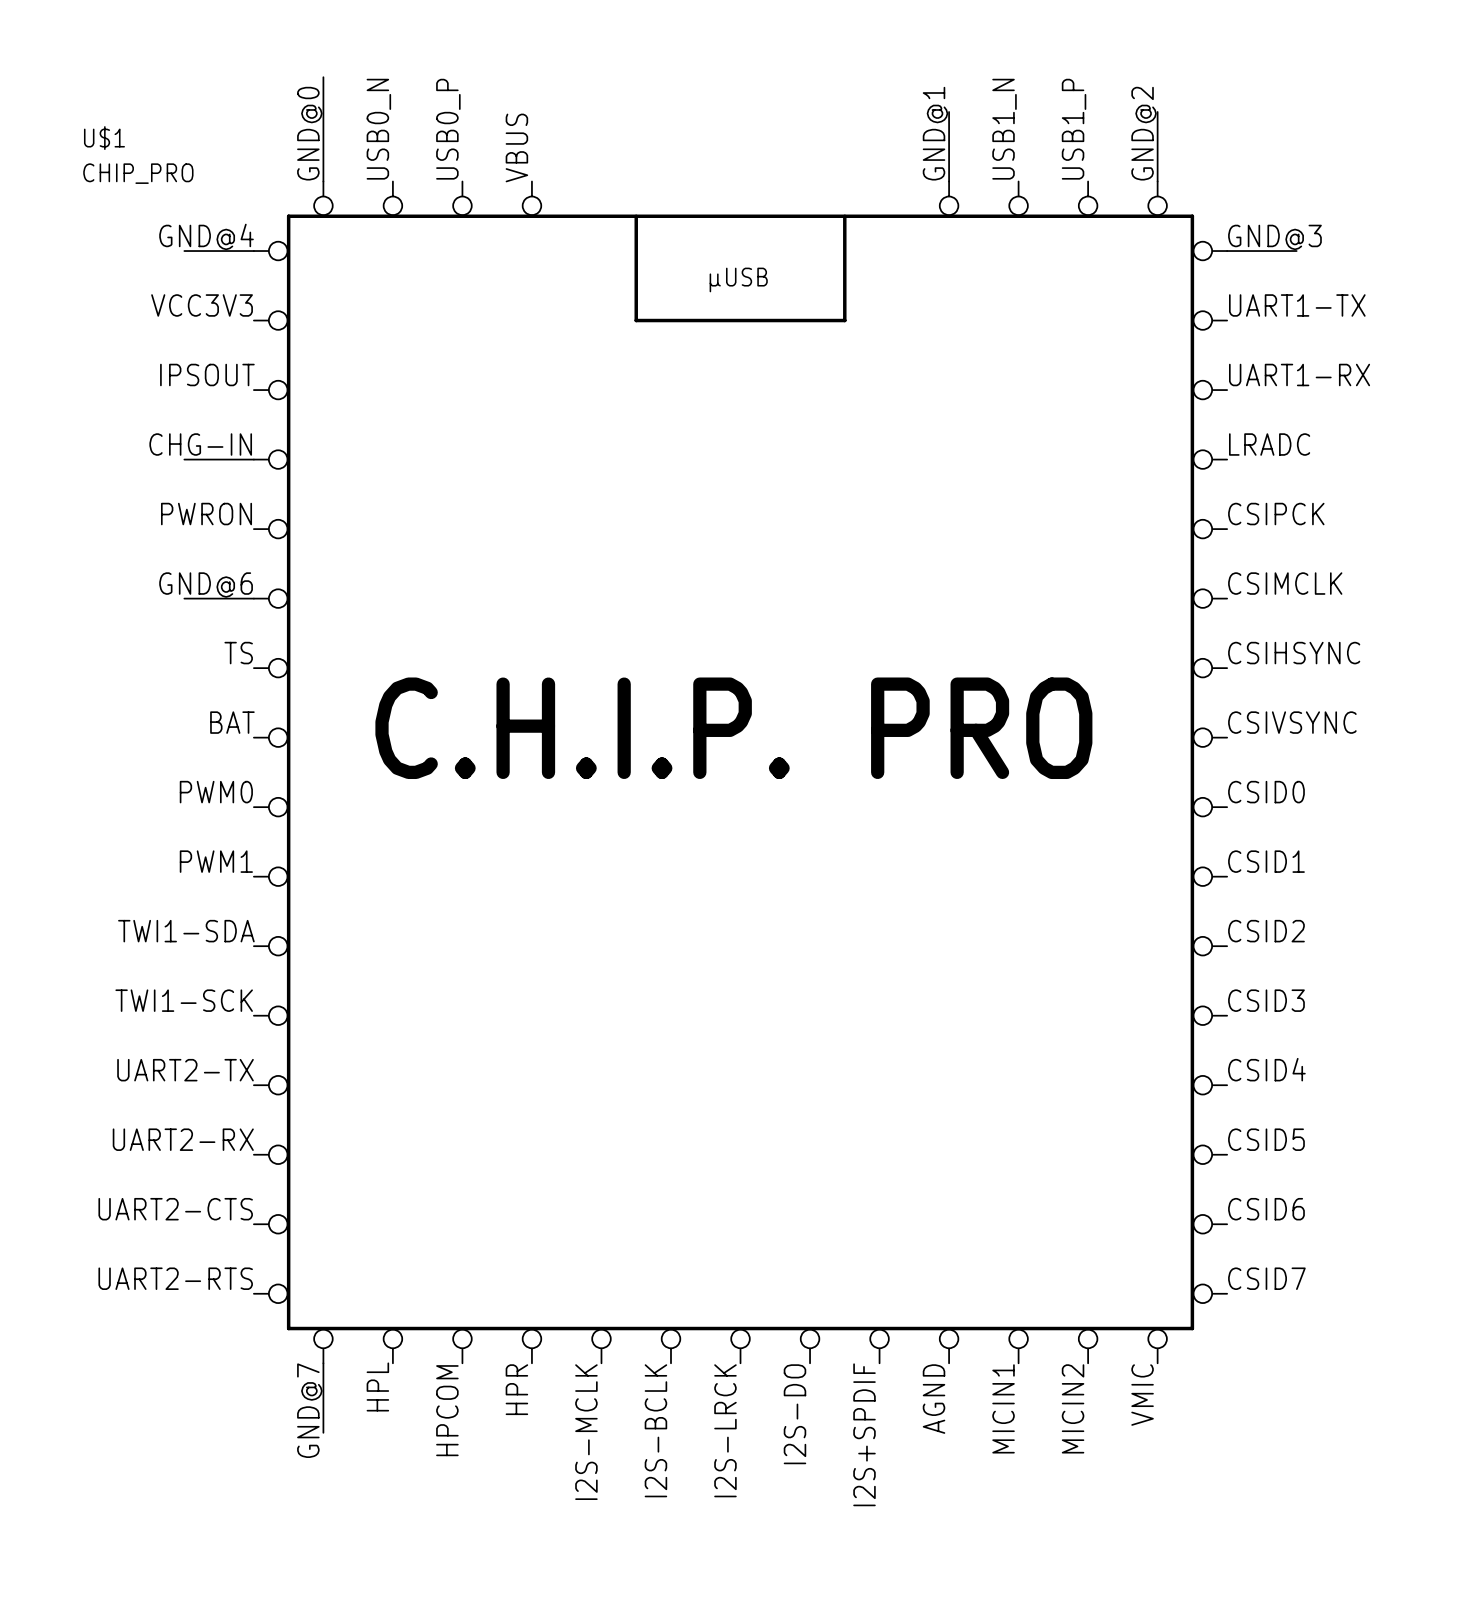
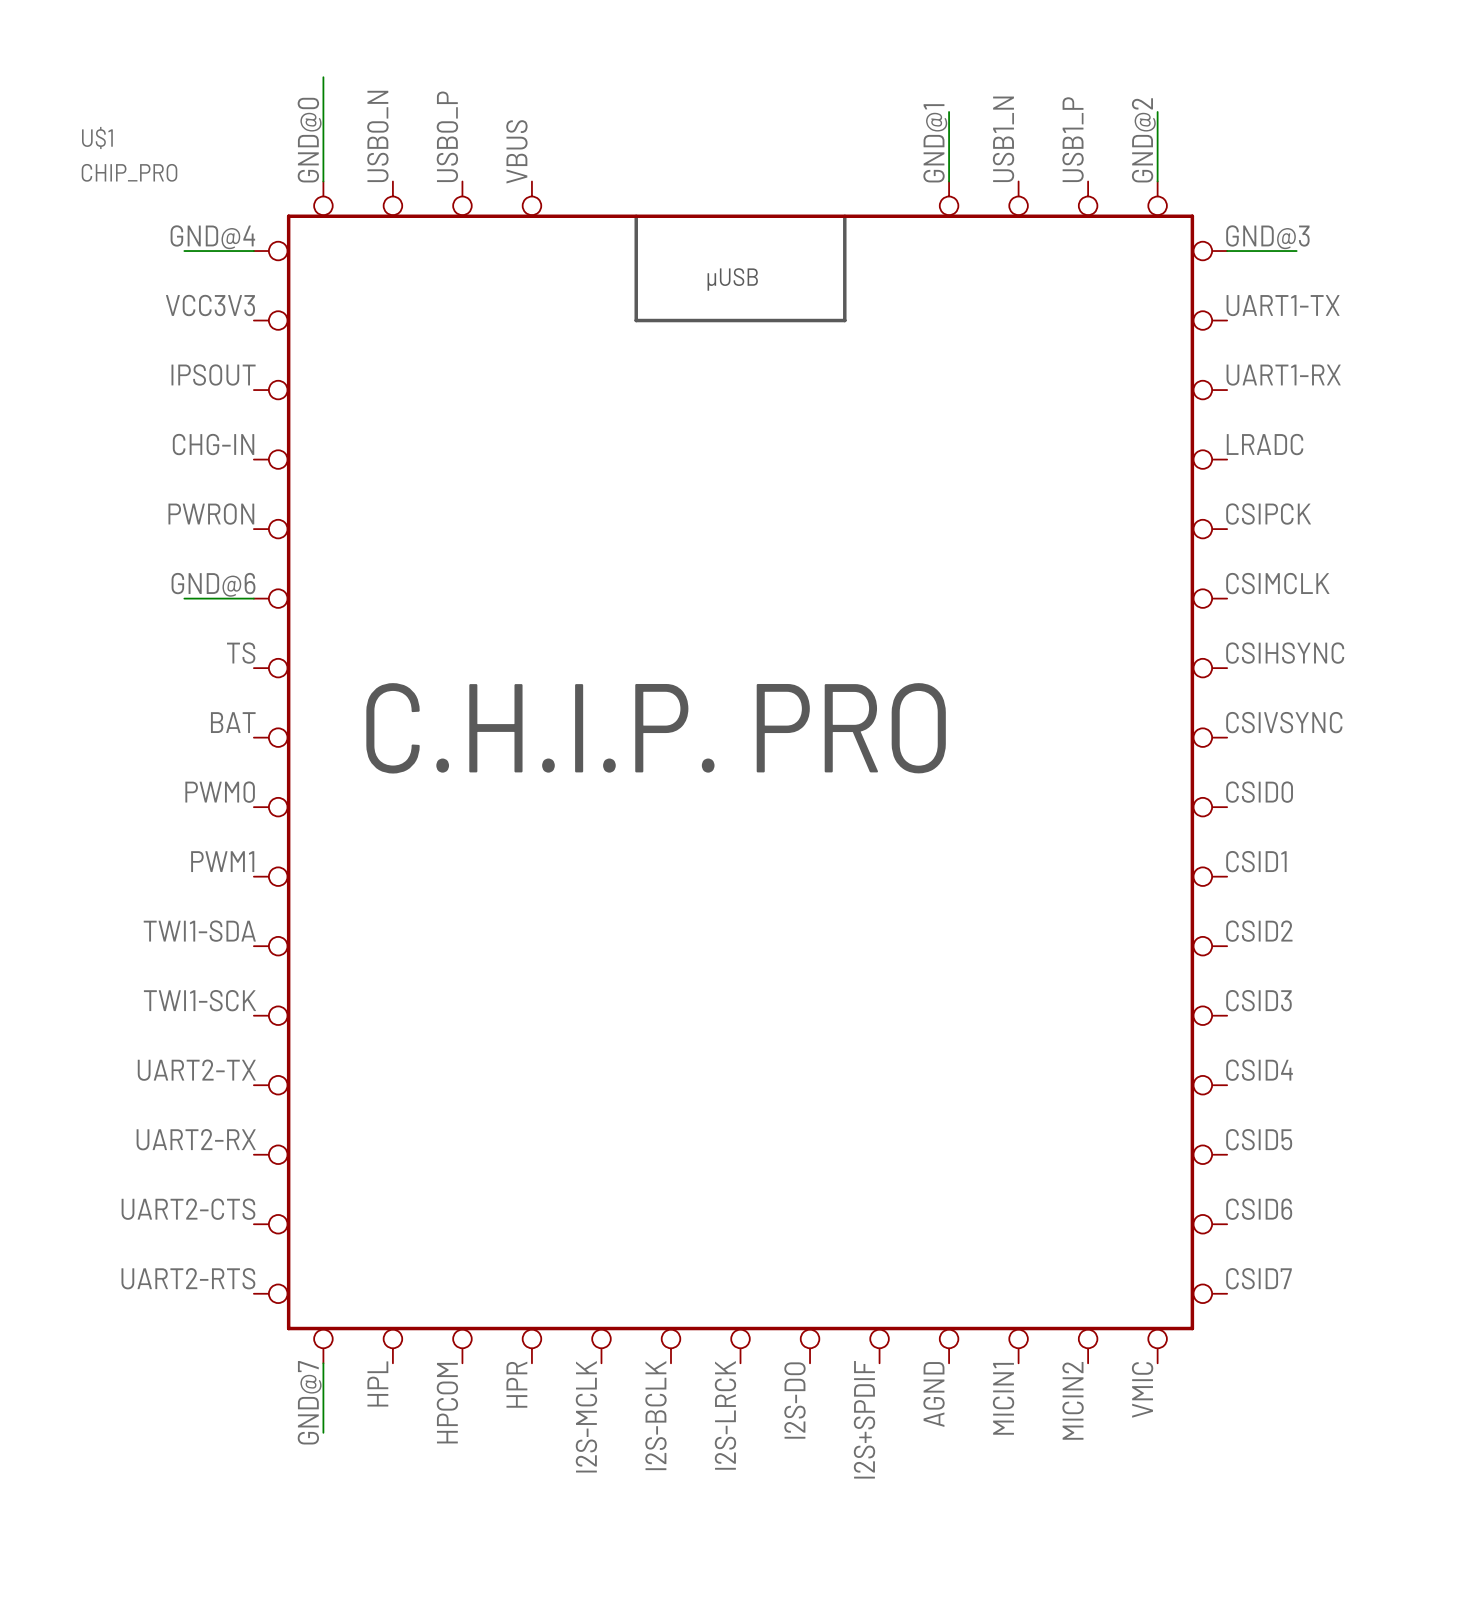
wire: (184, 459) (253, 459) -> none

